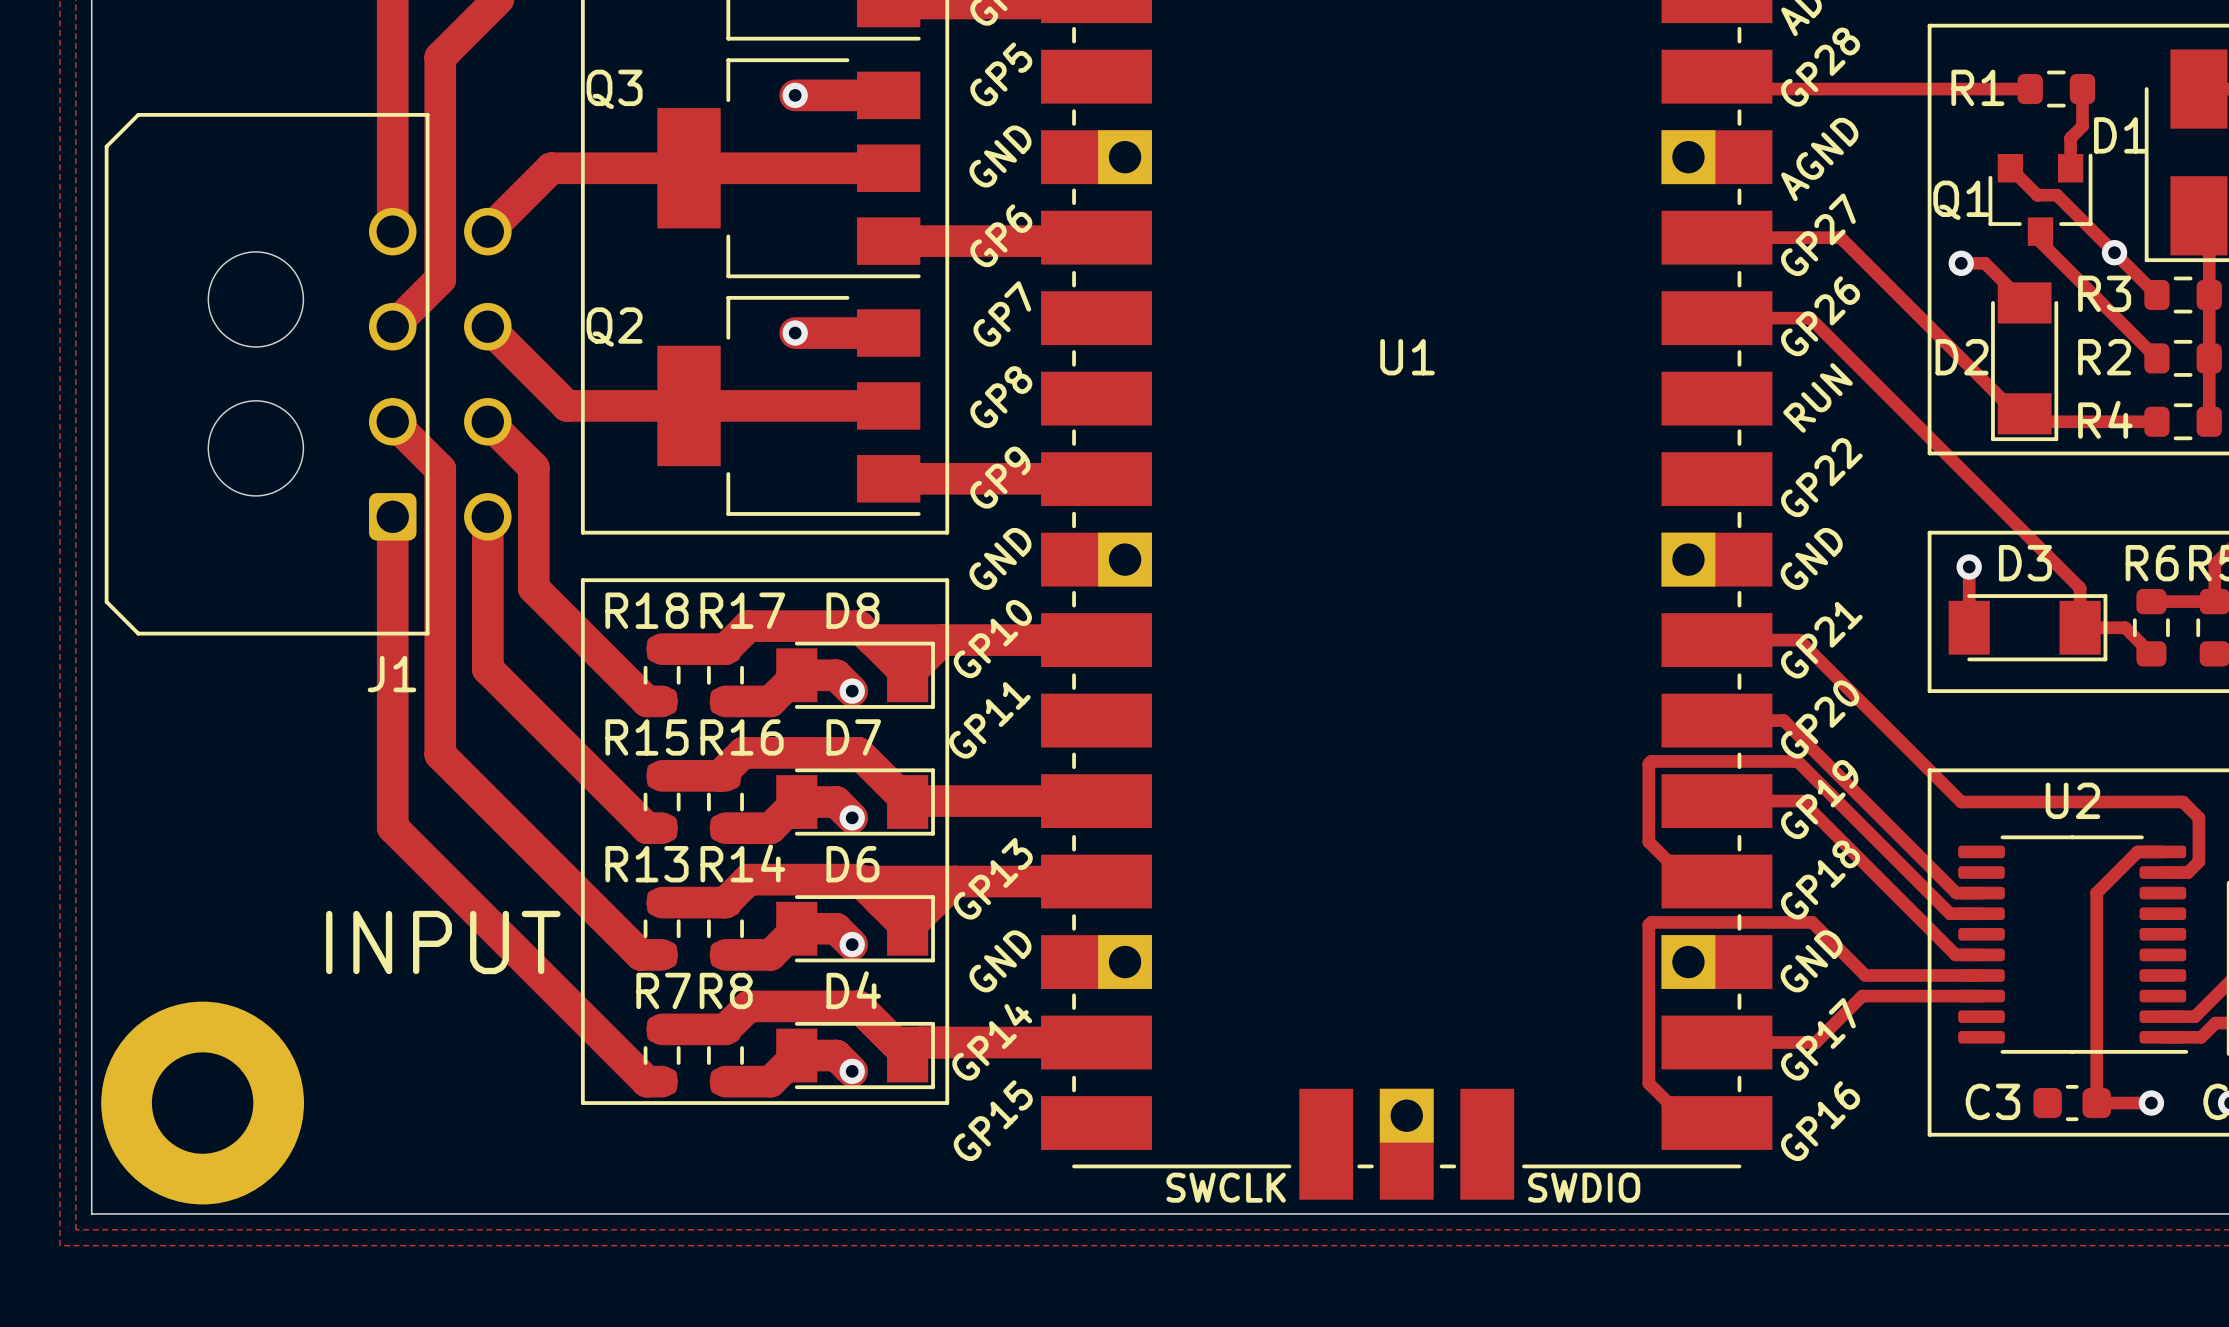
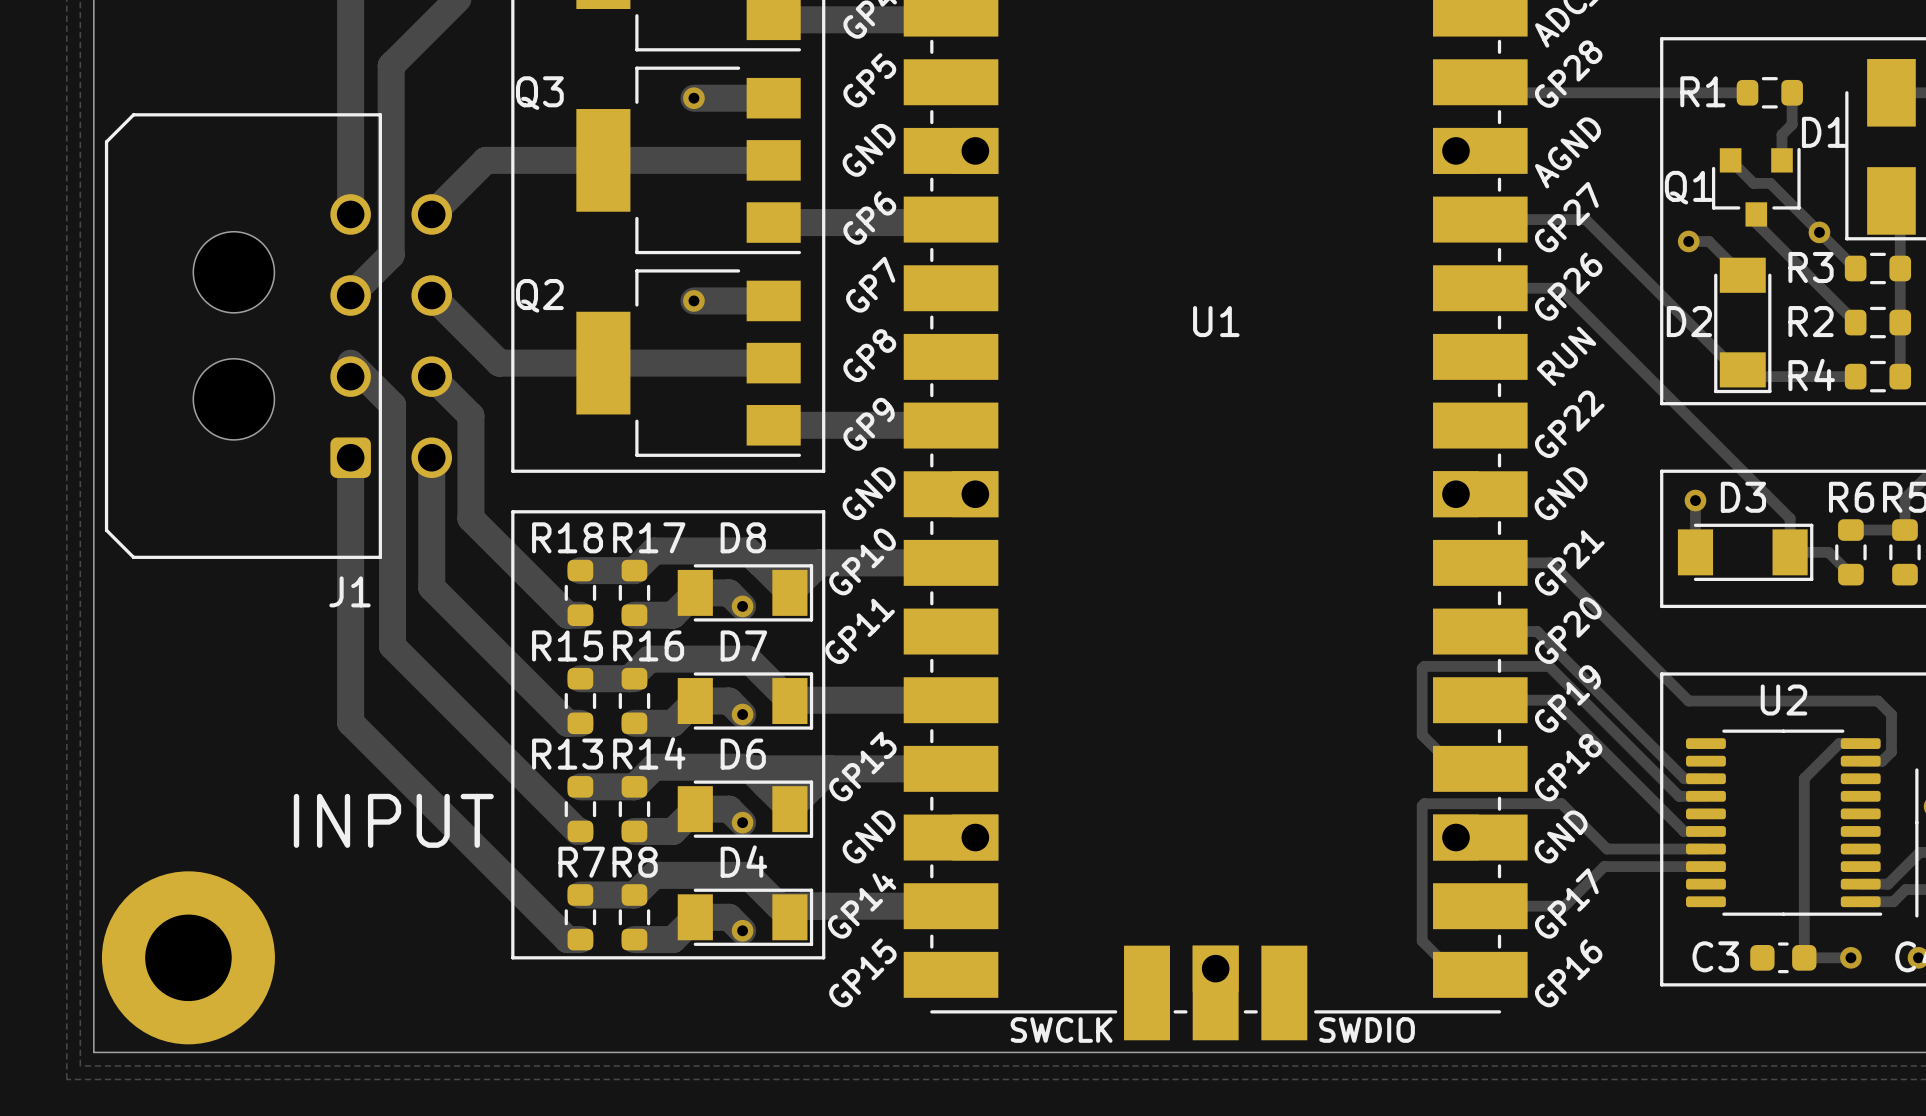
track: (392, 421) (440, 469) (440, 754) (640, 954) (658, 954) -> (350, 363) (392, 405) (392, 646) (577, 831)

